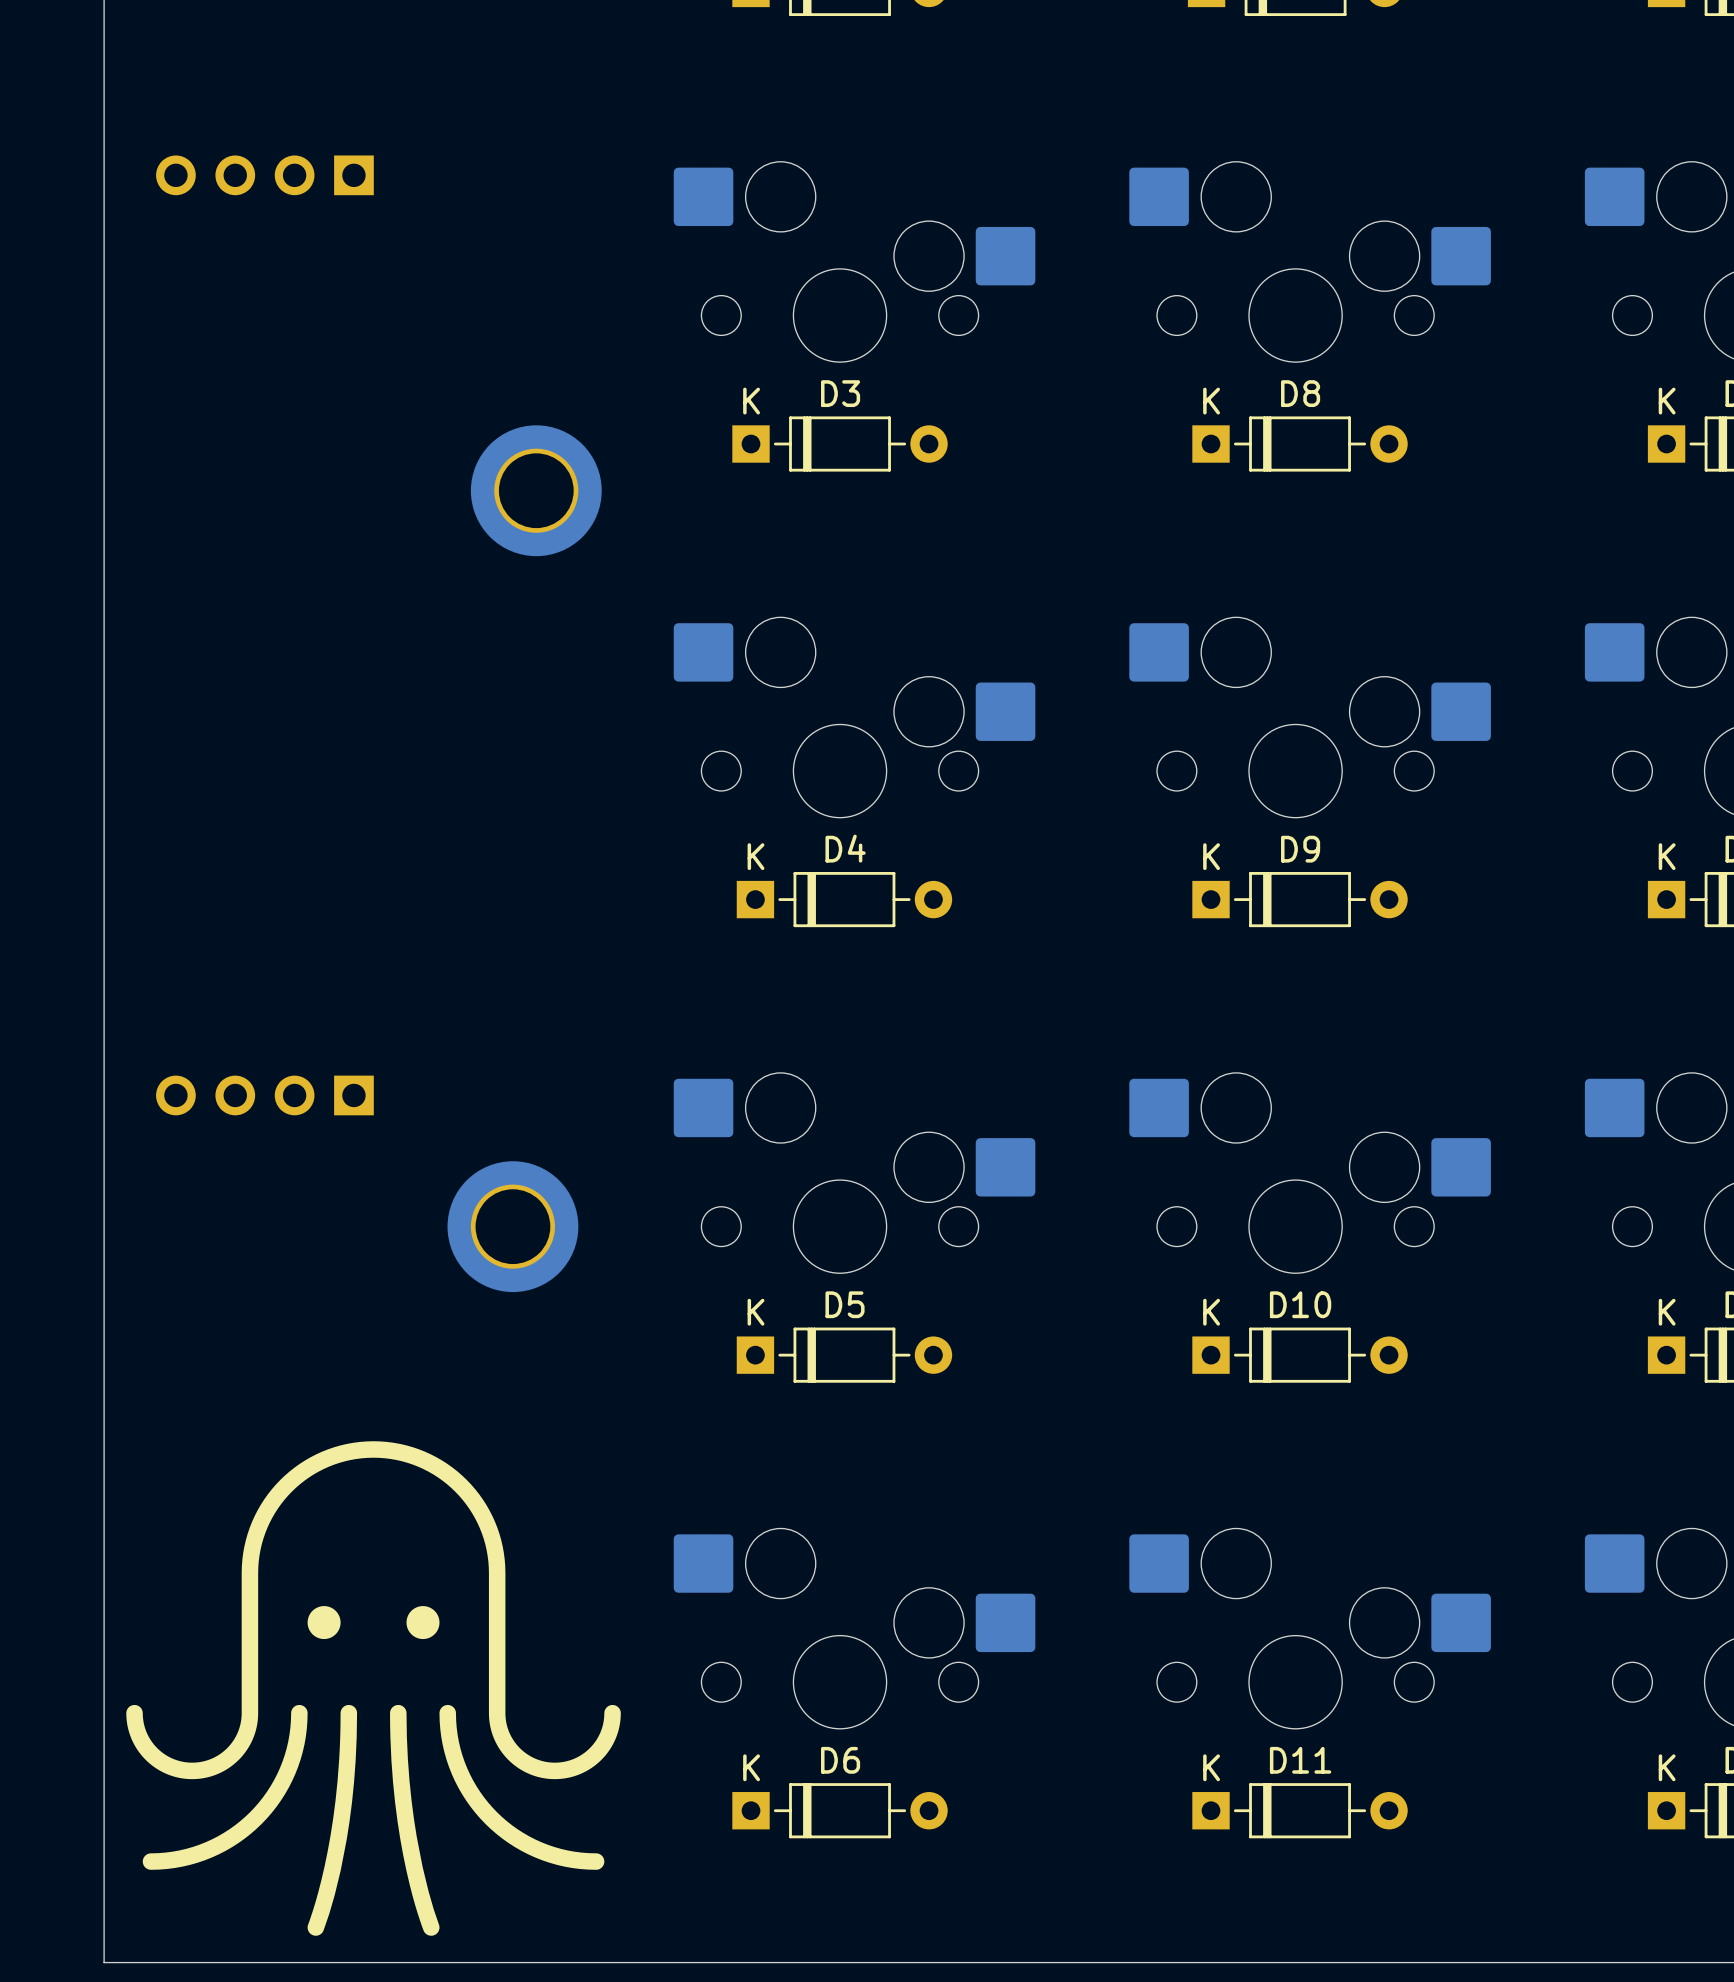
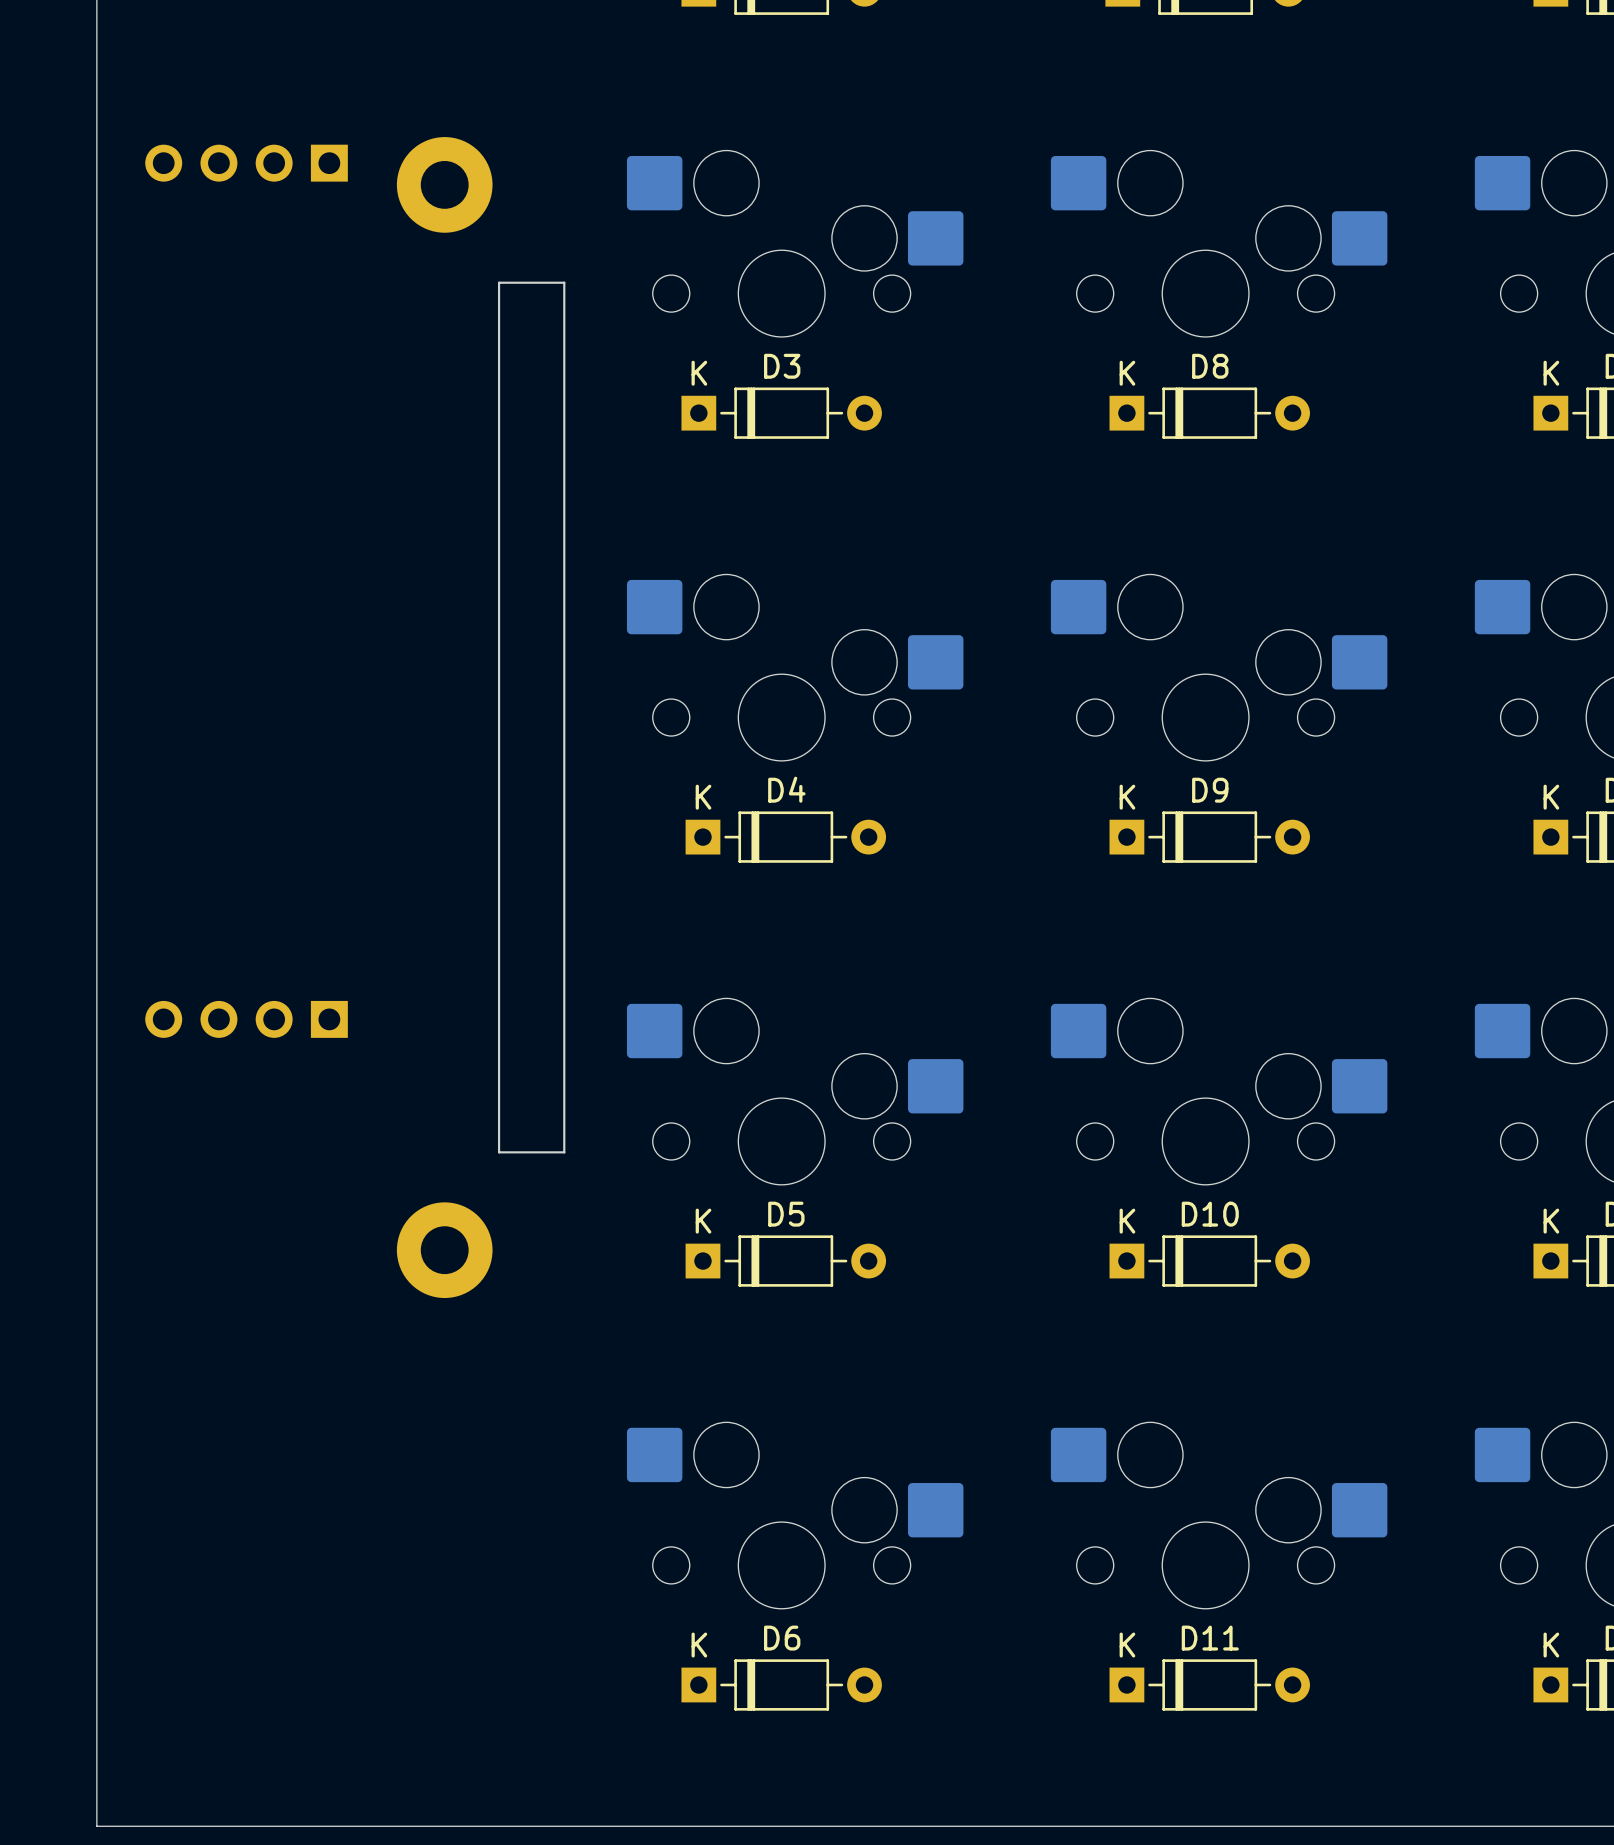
part: none -> (444, 184)
board edge: none -> (564, 282) (499, 282) (499, 1152) (564, 1152) (564, 282)
part: (536, 490) -> none
part: (512, 1226) -> none
part: none -> (444, 1250)
drawing: [126, 1441, 621, 1936] -> none

